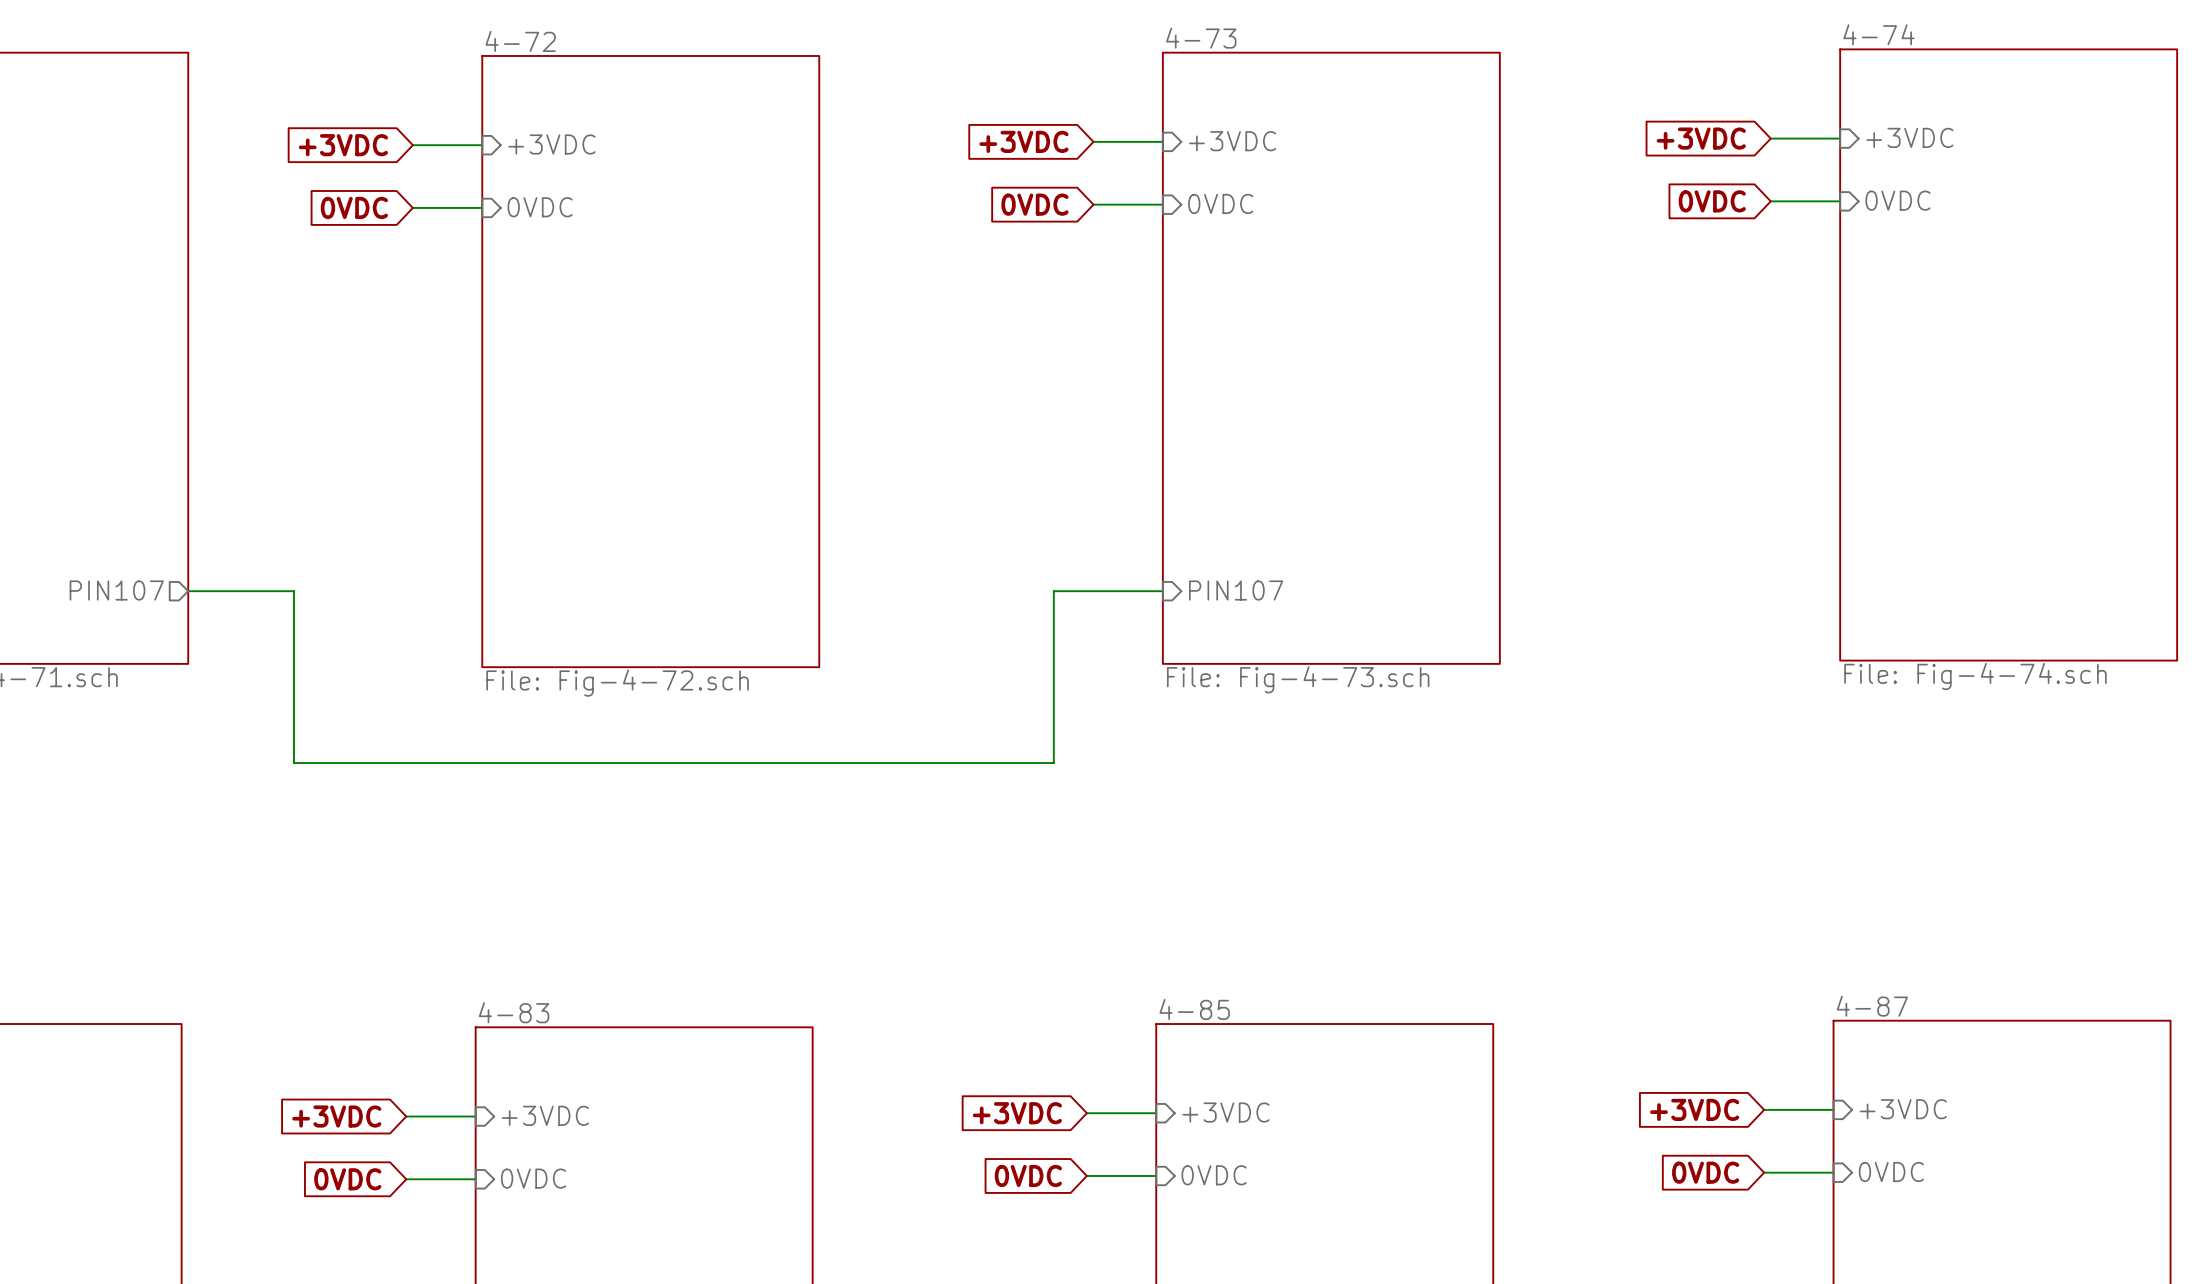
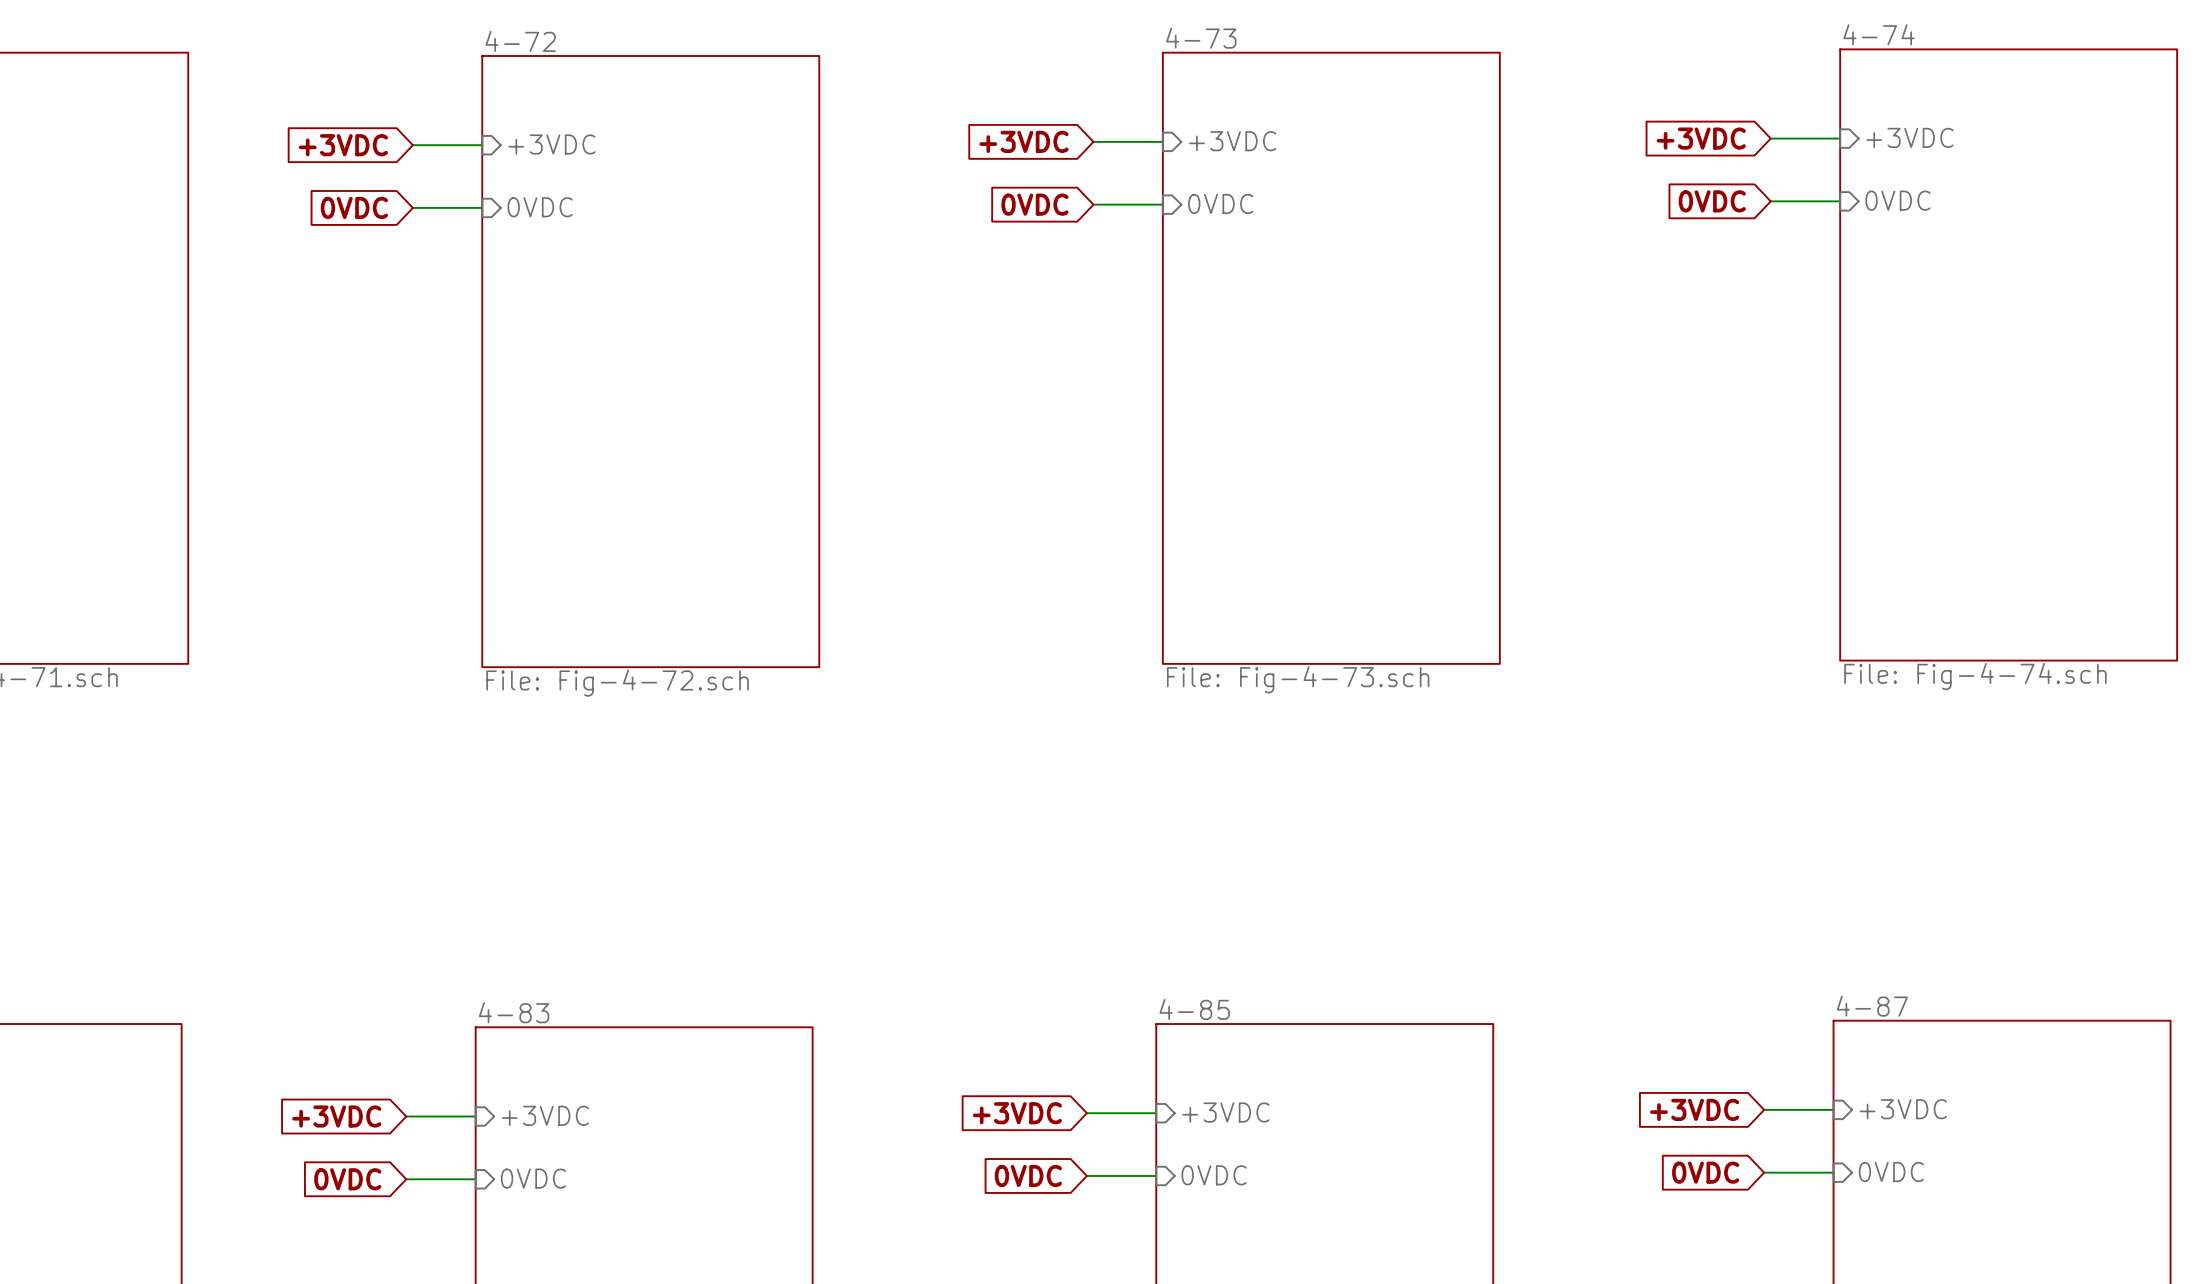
sheet pin: PIN107 (116, 590) -> none
sheet pin: PIN107 (1236, 590) -> none
wire: (188, 591) (293, 591) (293, 763) (1053, 763) (1053, 591) (1162, 591) -> none

